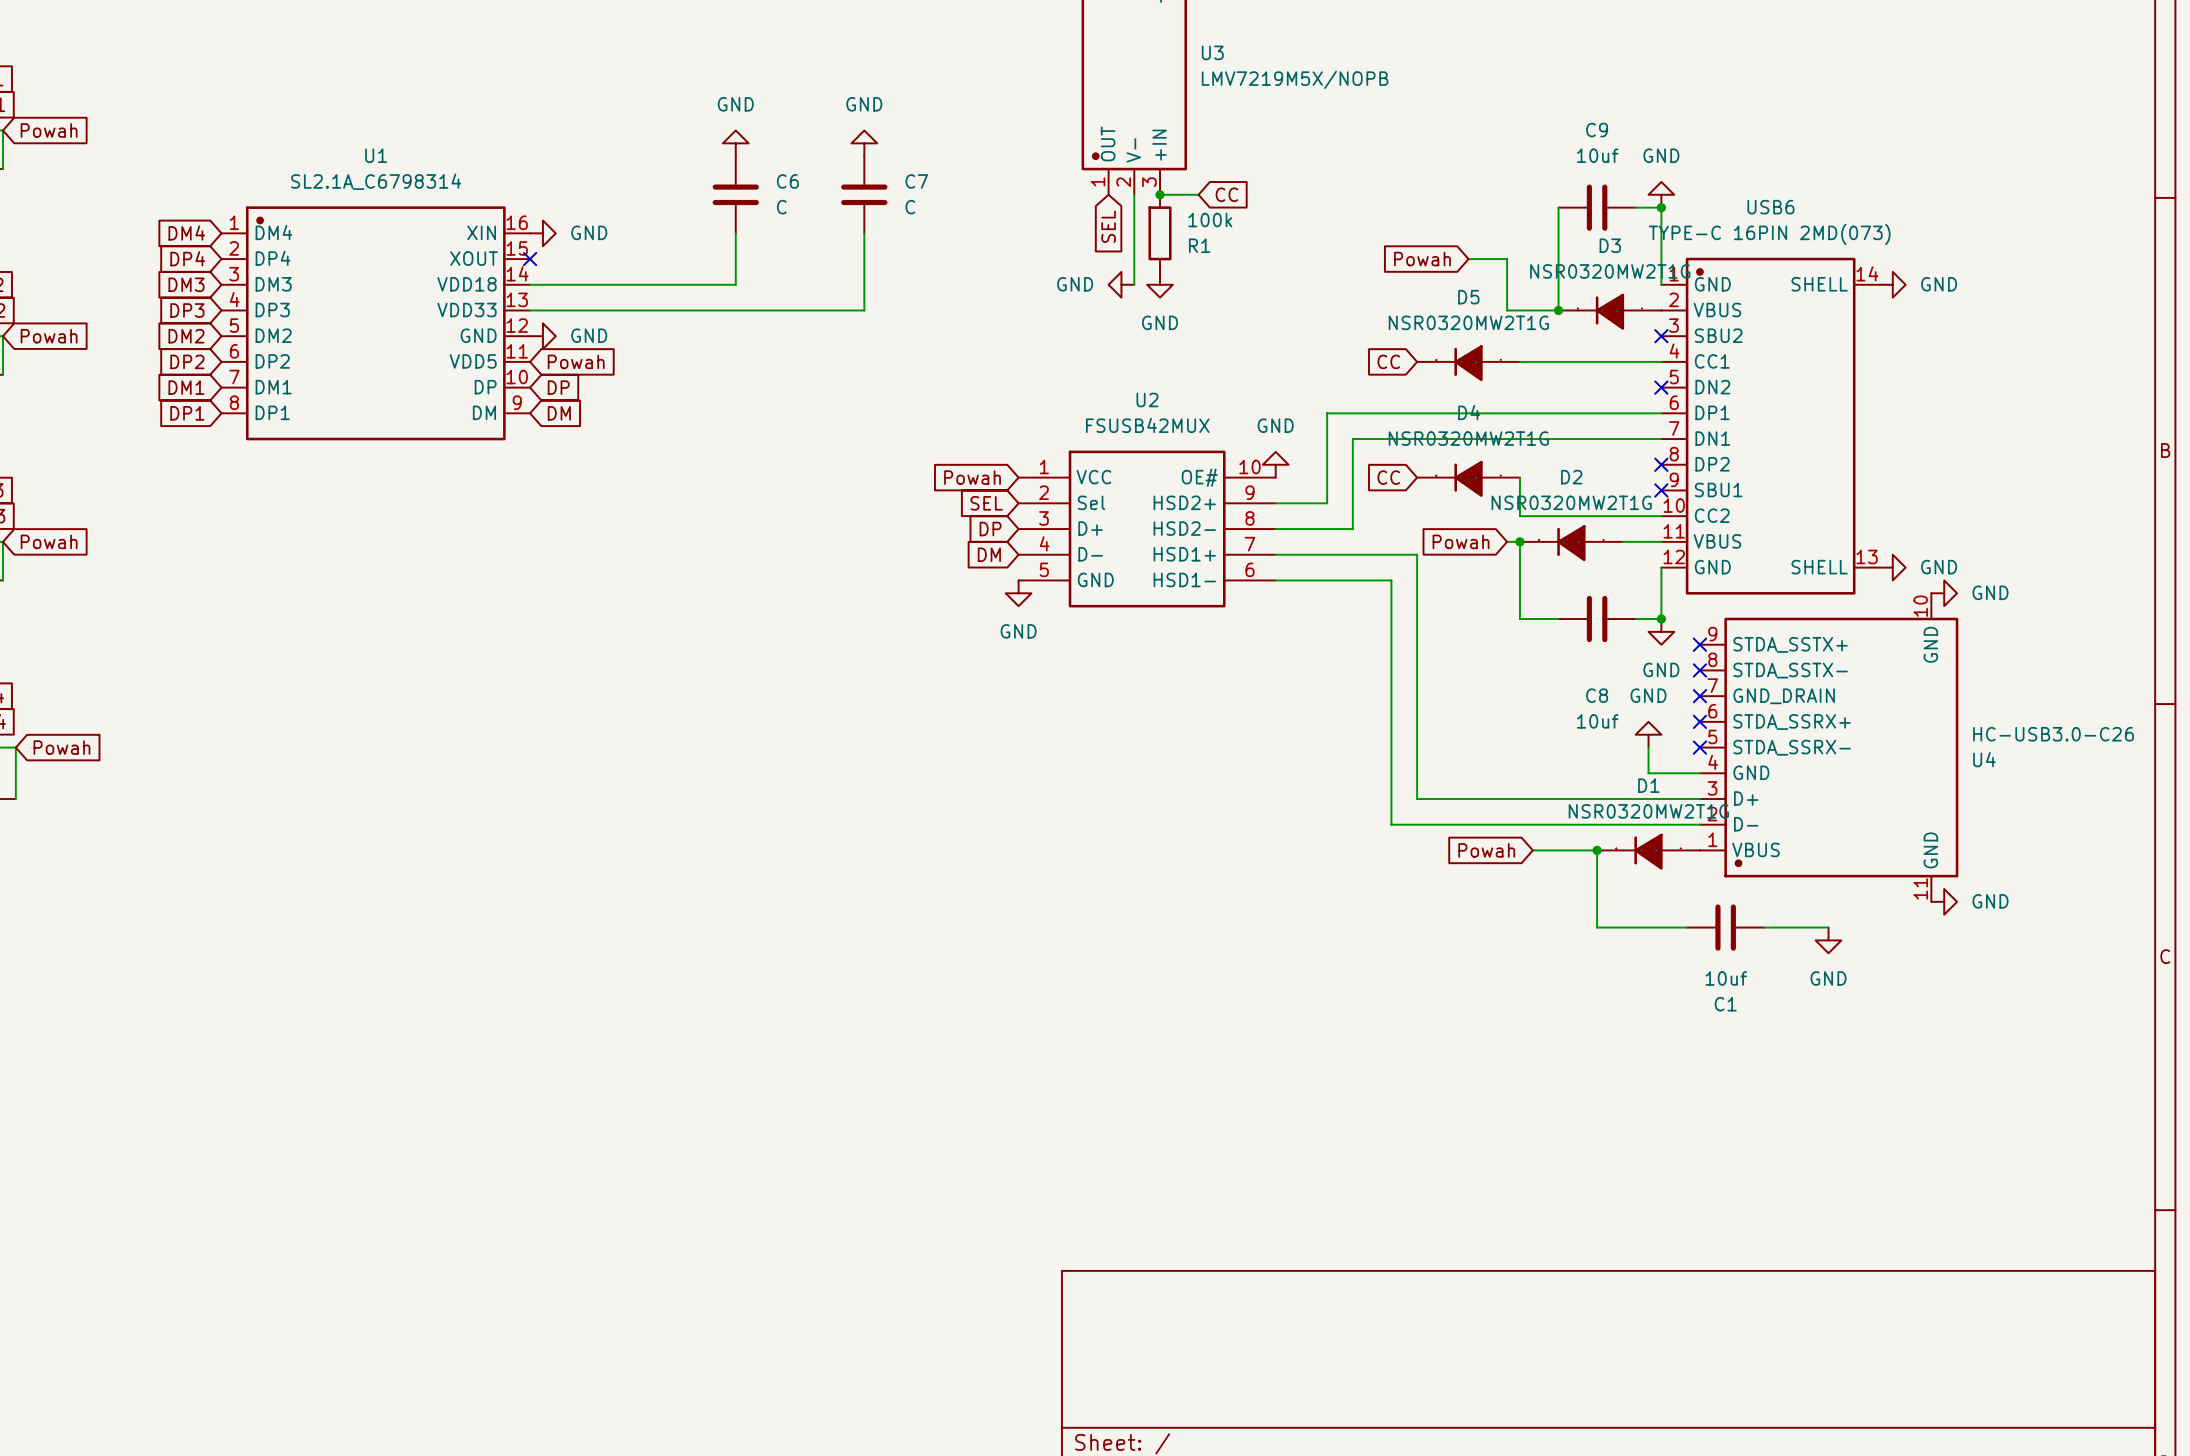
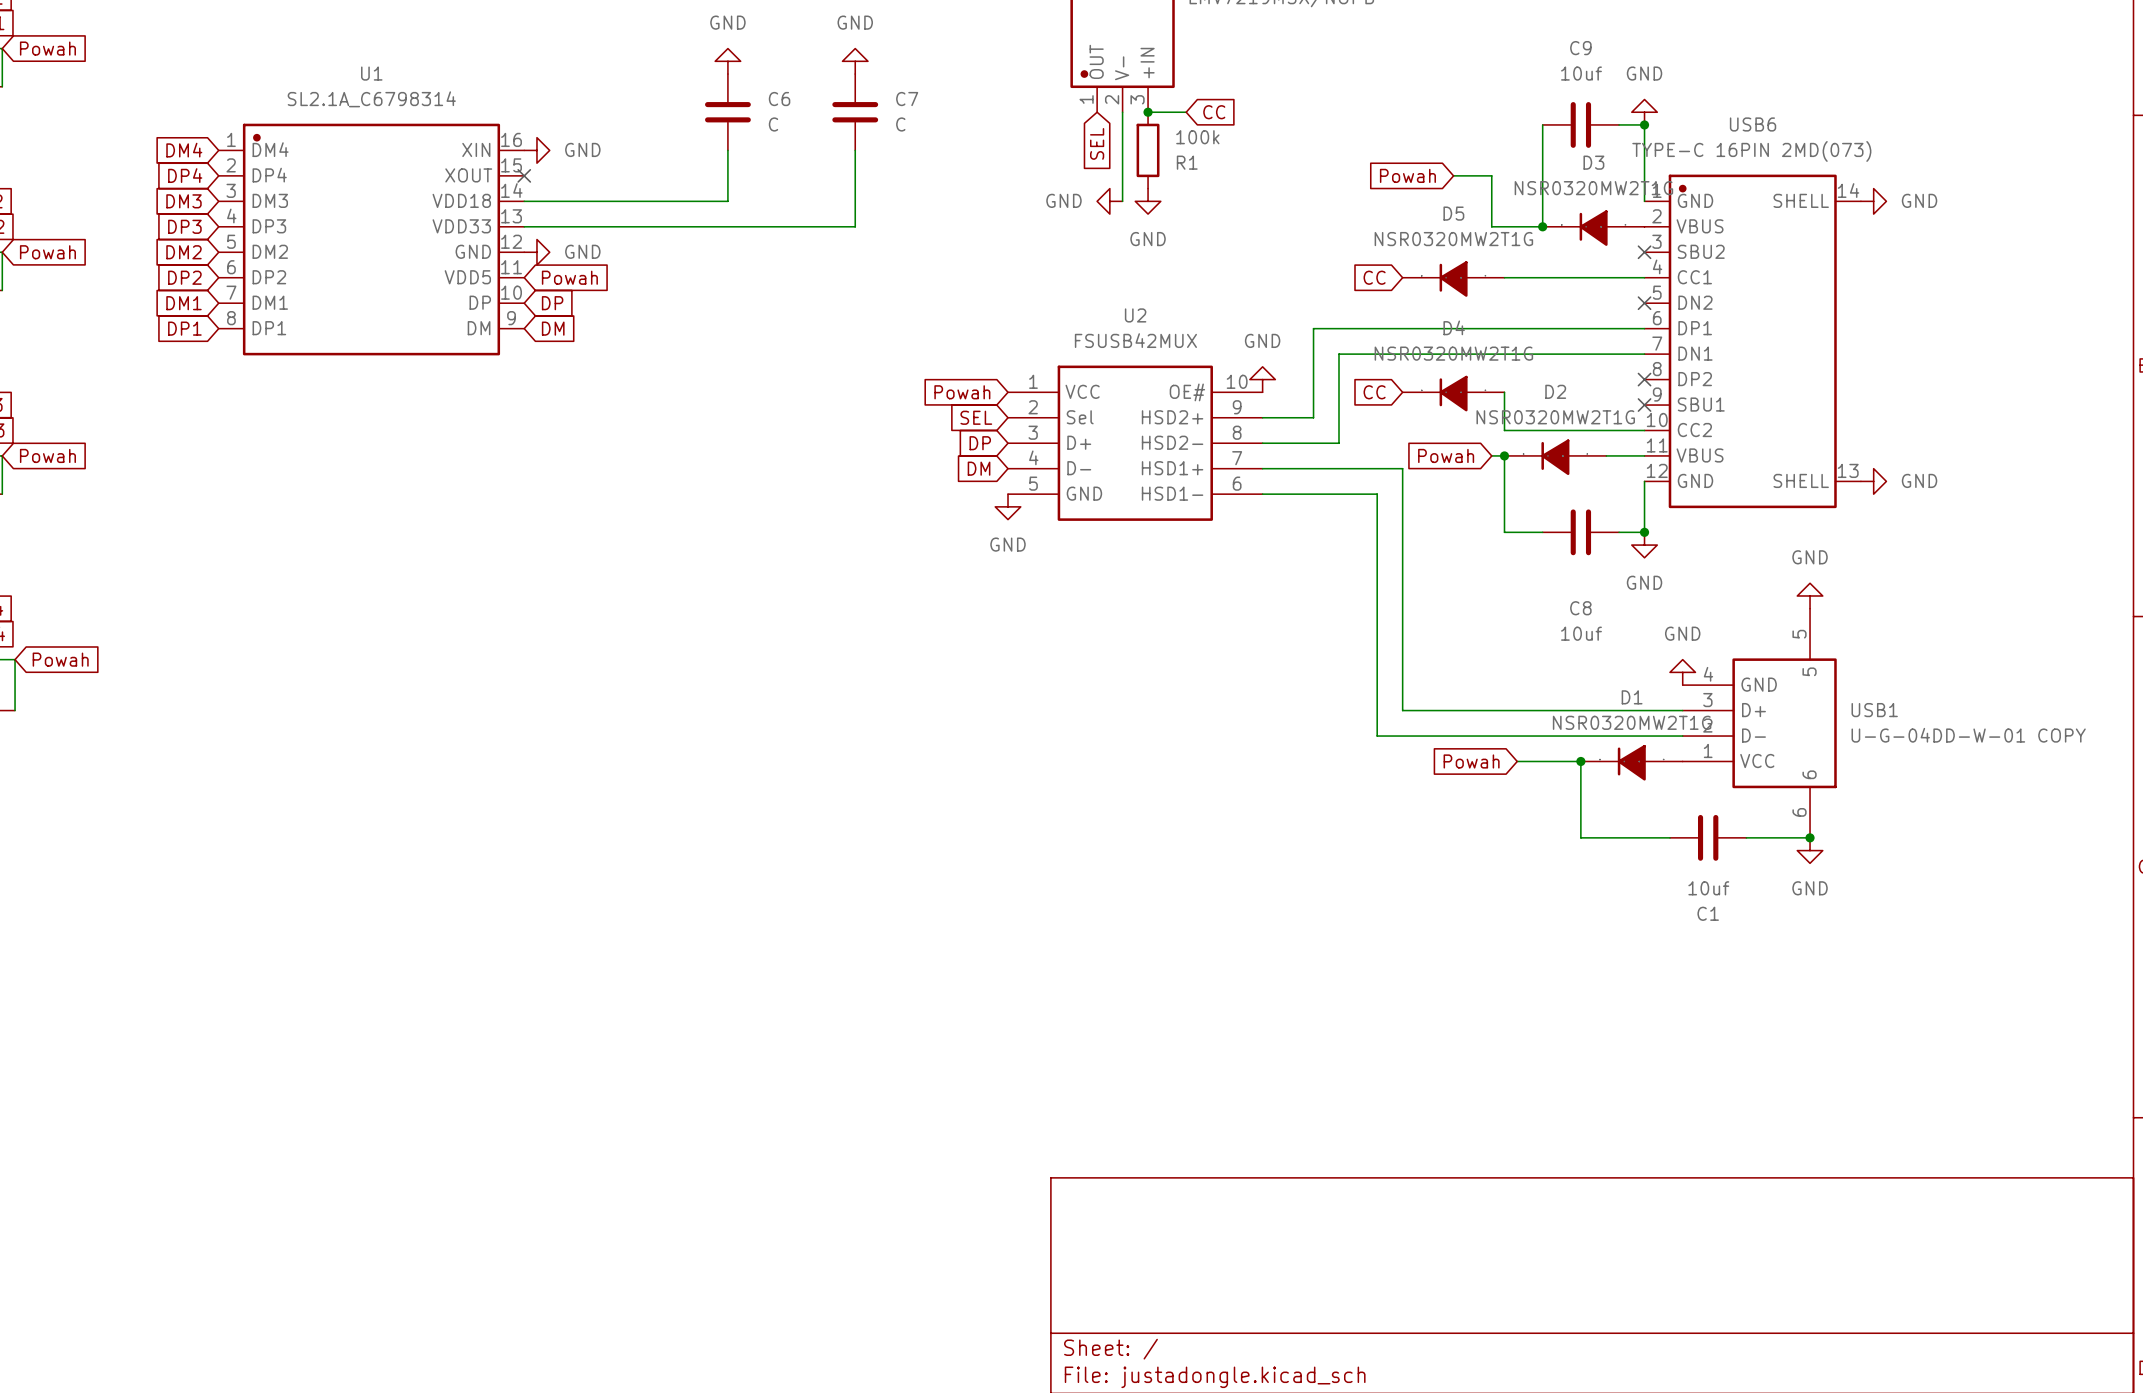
power symbol: GND (1944, 593) -> none
no-connect mark: (1699, 644) -> none
no-connect mark: (1699, 670) -> none
power symbol: none -> GND (1810, 595)
no-connect mark: (1699, 696) -> none
no-connect mark: (1699, 721) -> none
power symbol position: GND (1648, 734) -> GND (1682, 672)
wire: (1648, 747) (1648, 773) (1699, 773) -> none
no-connect mark: (1699, 747) -> none
U4: HC-USB3.0-C26 (1829, 747) -> none
USB1: none -> U-G-04DD-W-01 COPY (1759, 723)
power symbol: GND (1944, 901) -> none
junction: none -> (1810, 837)

